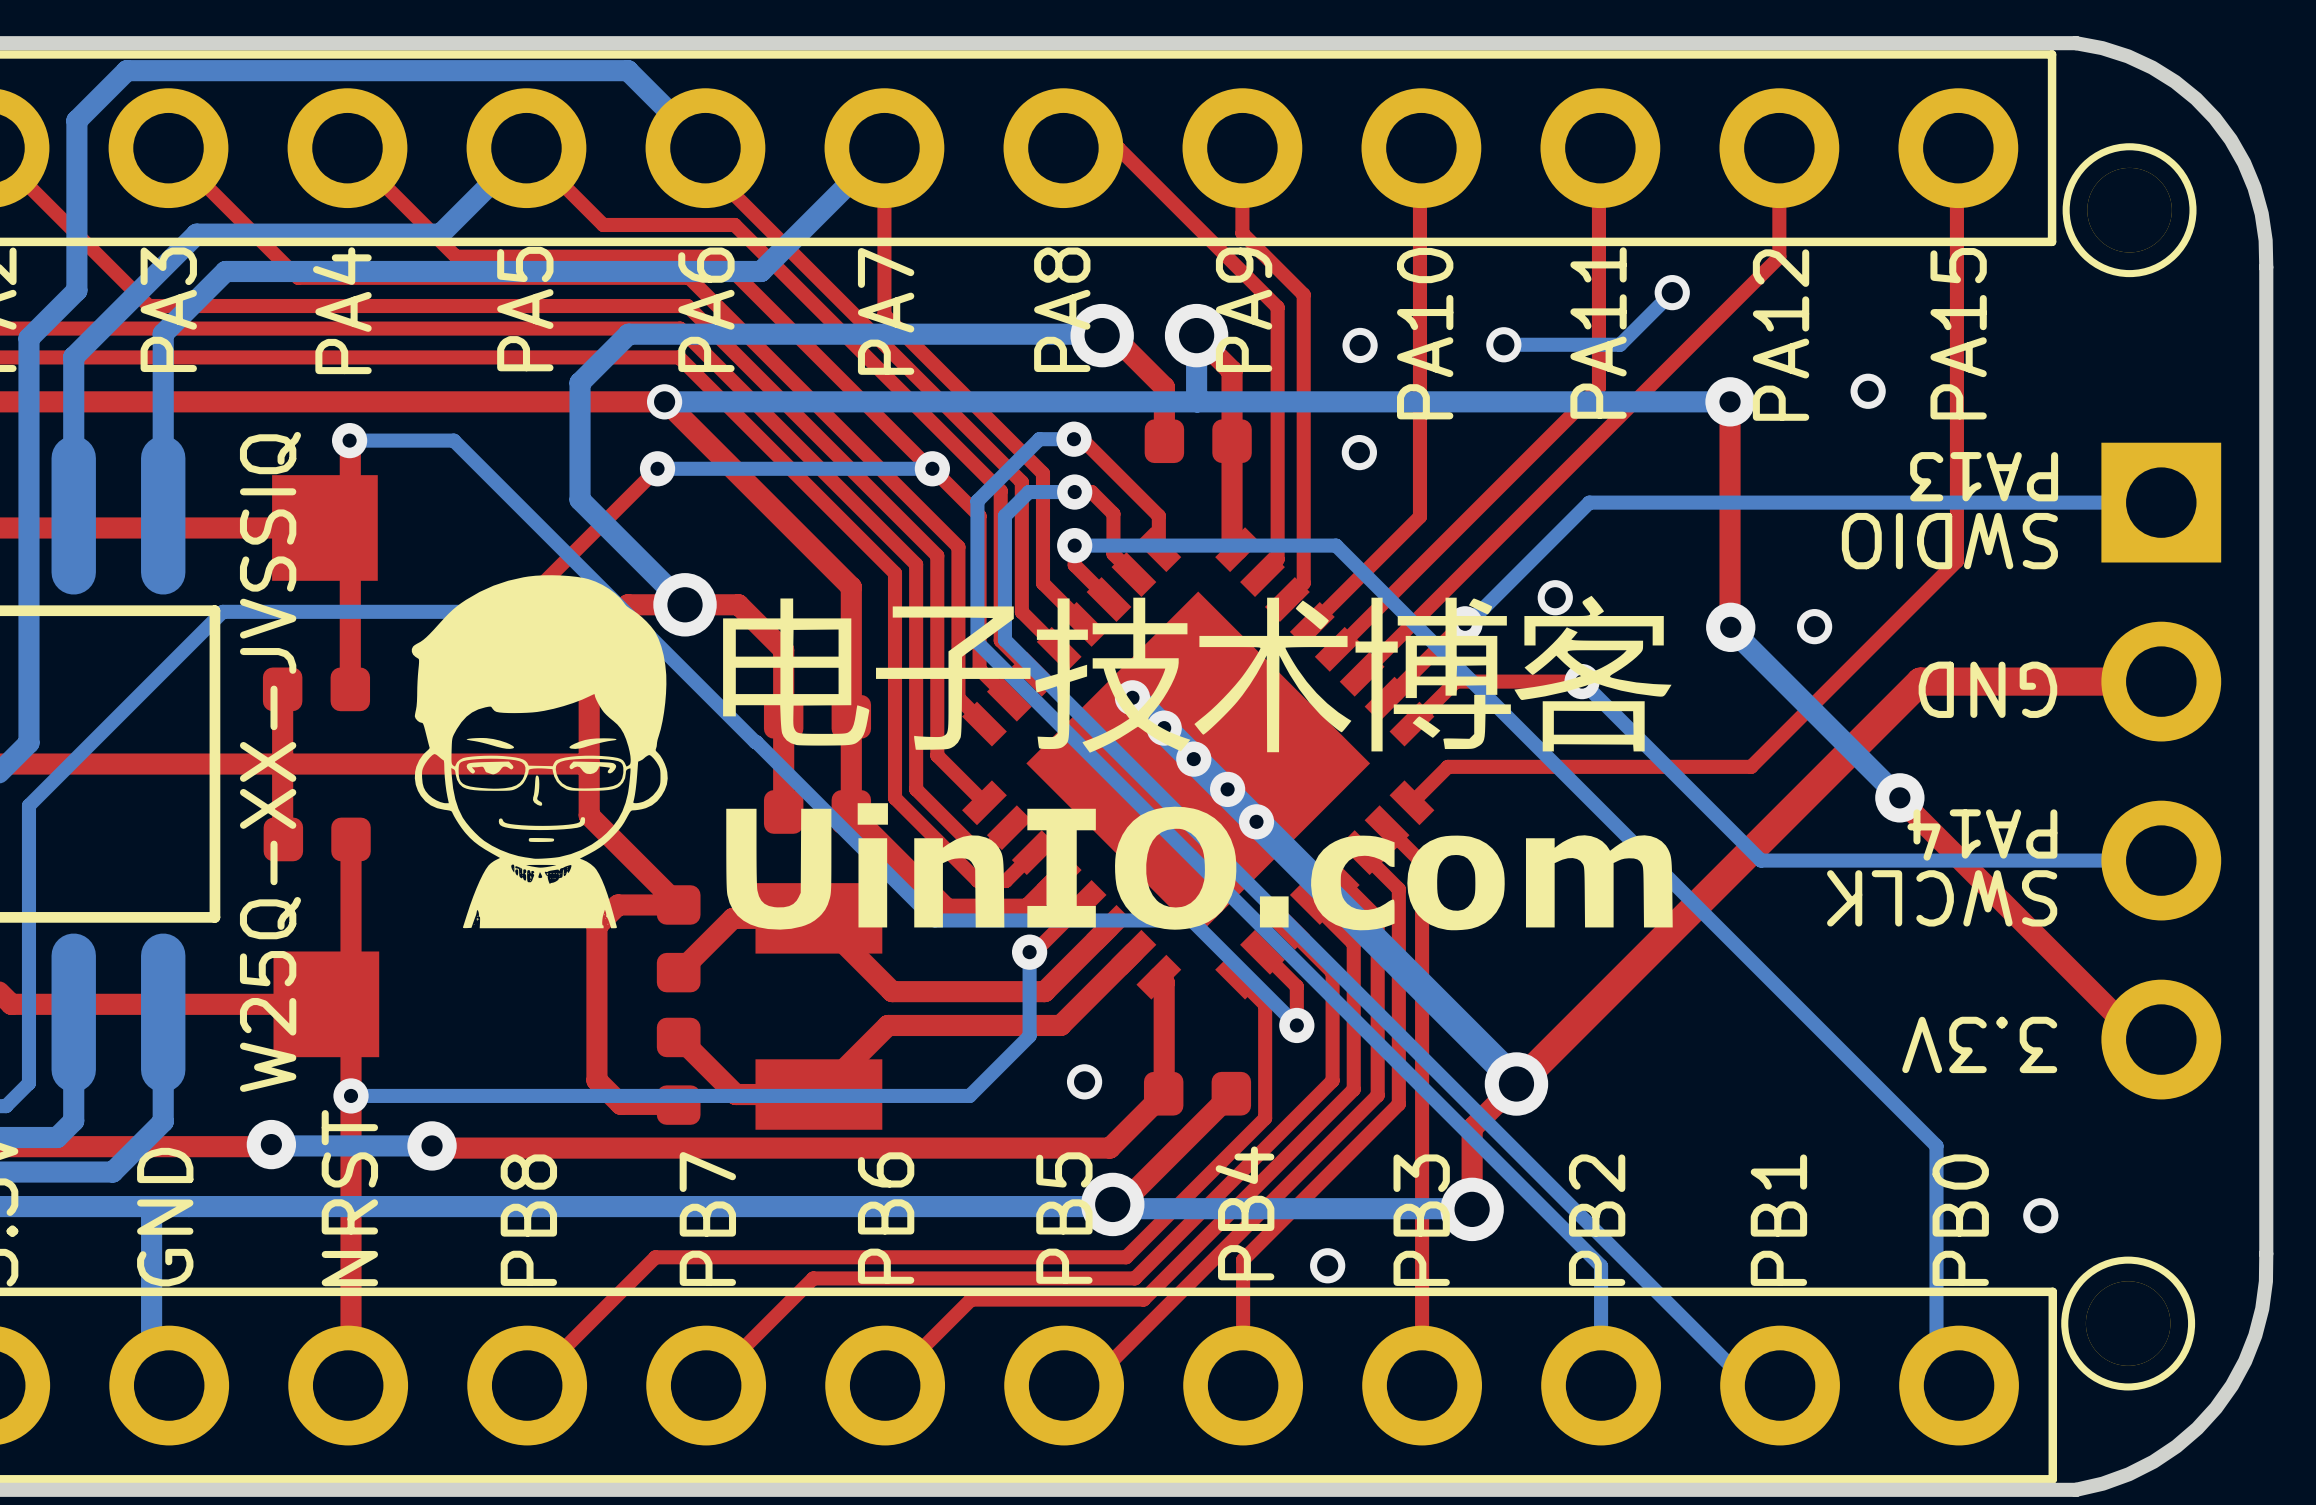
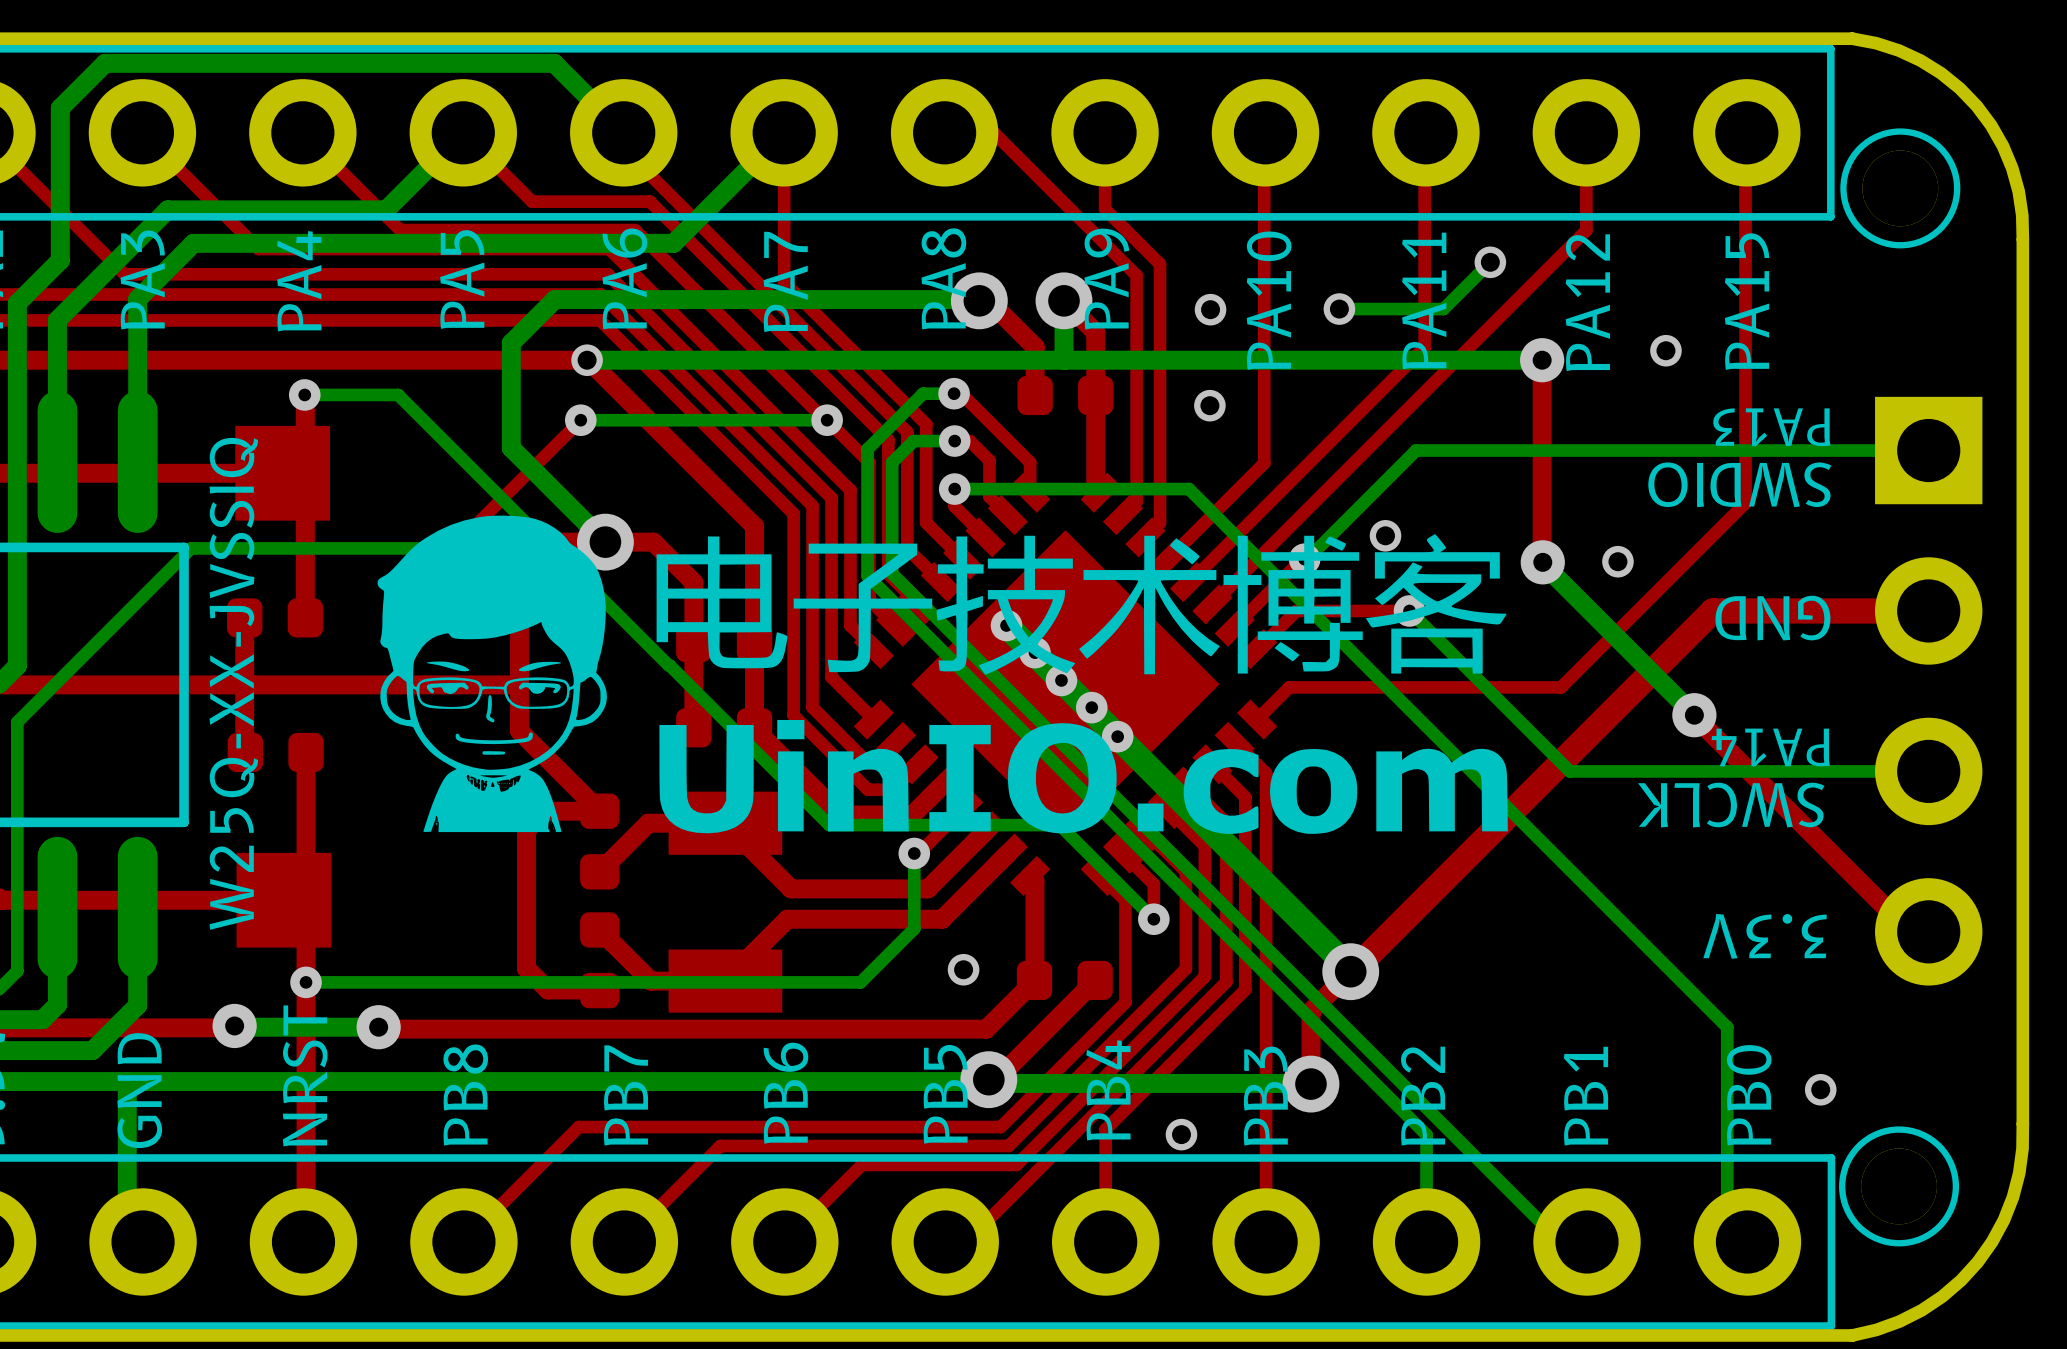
drawing position: (1042, 752) -> (942, 674)

